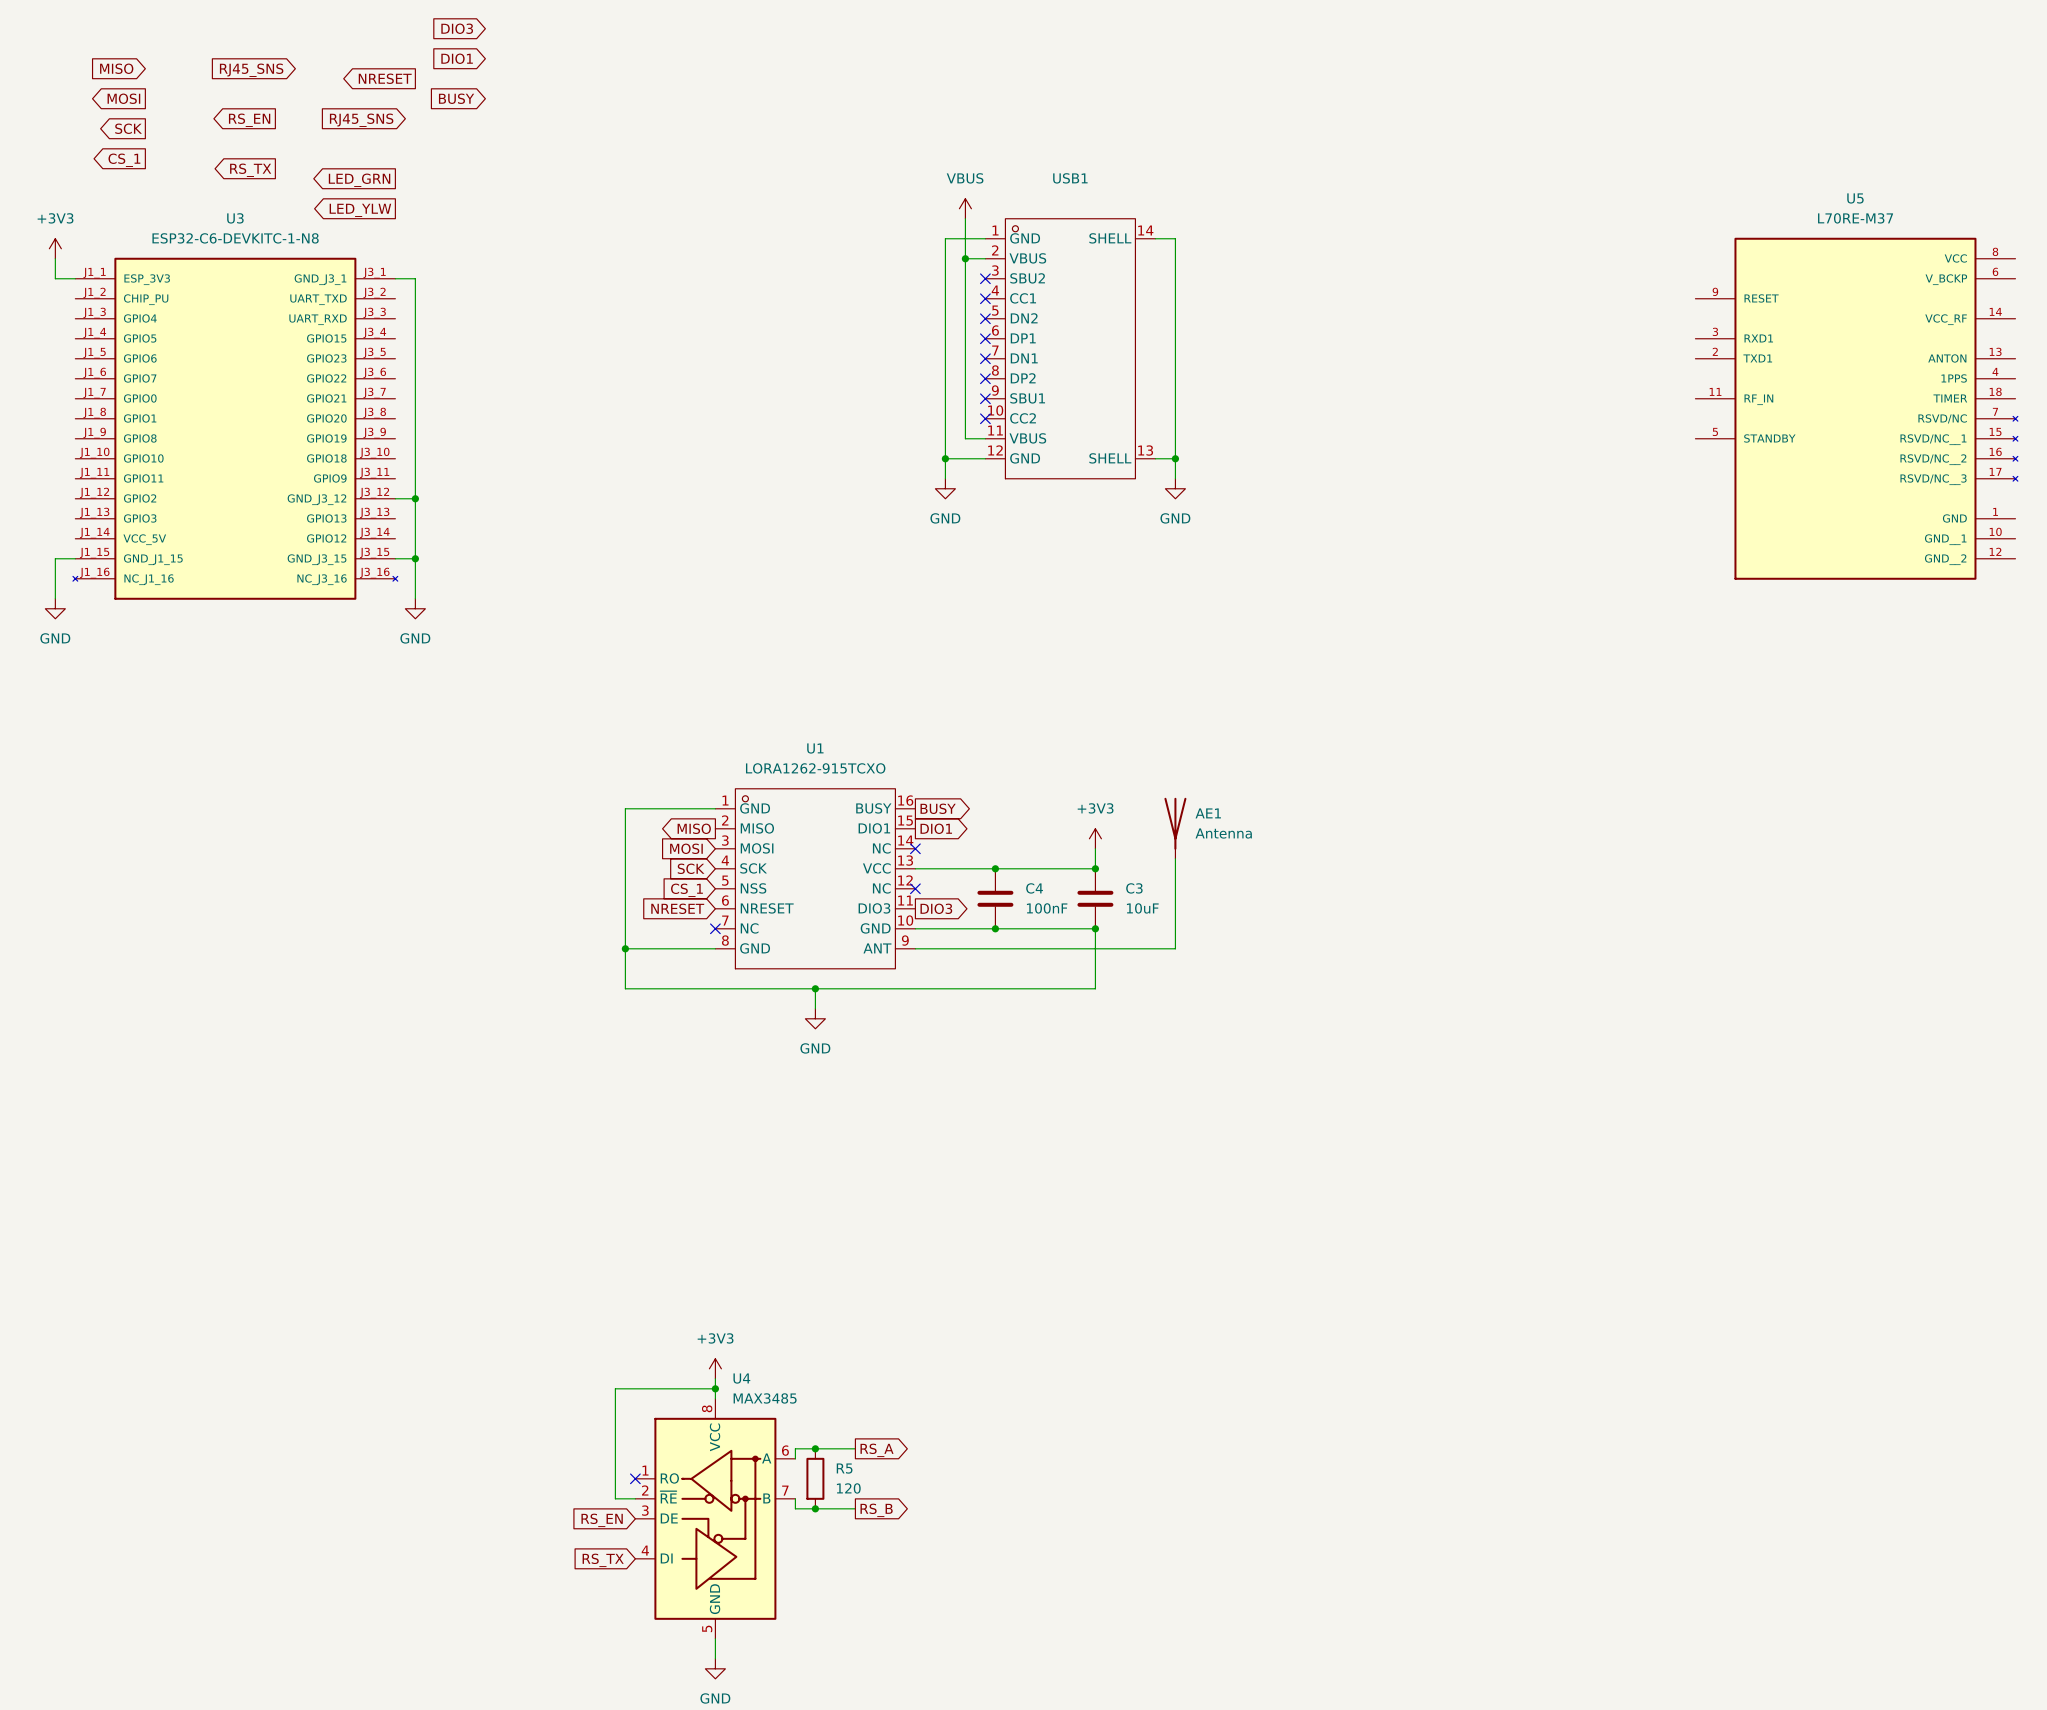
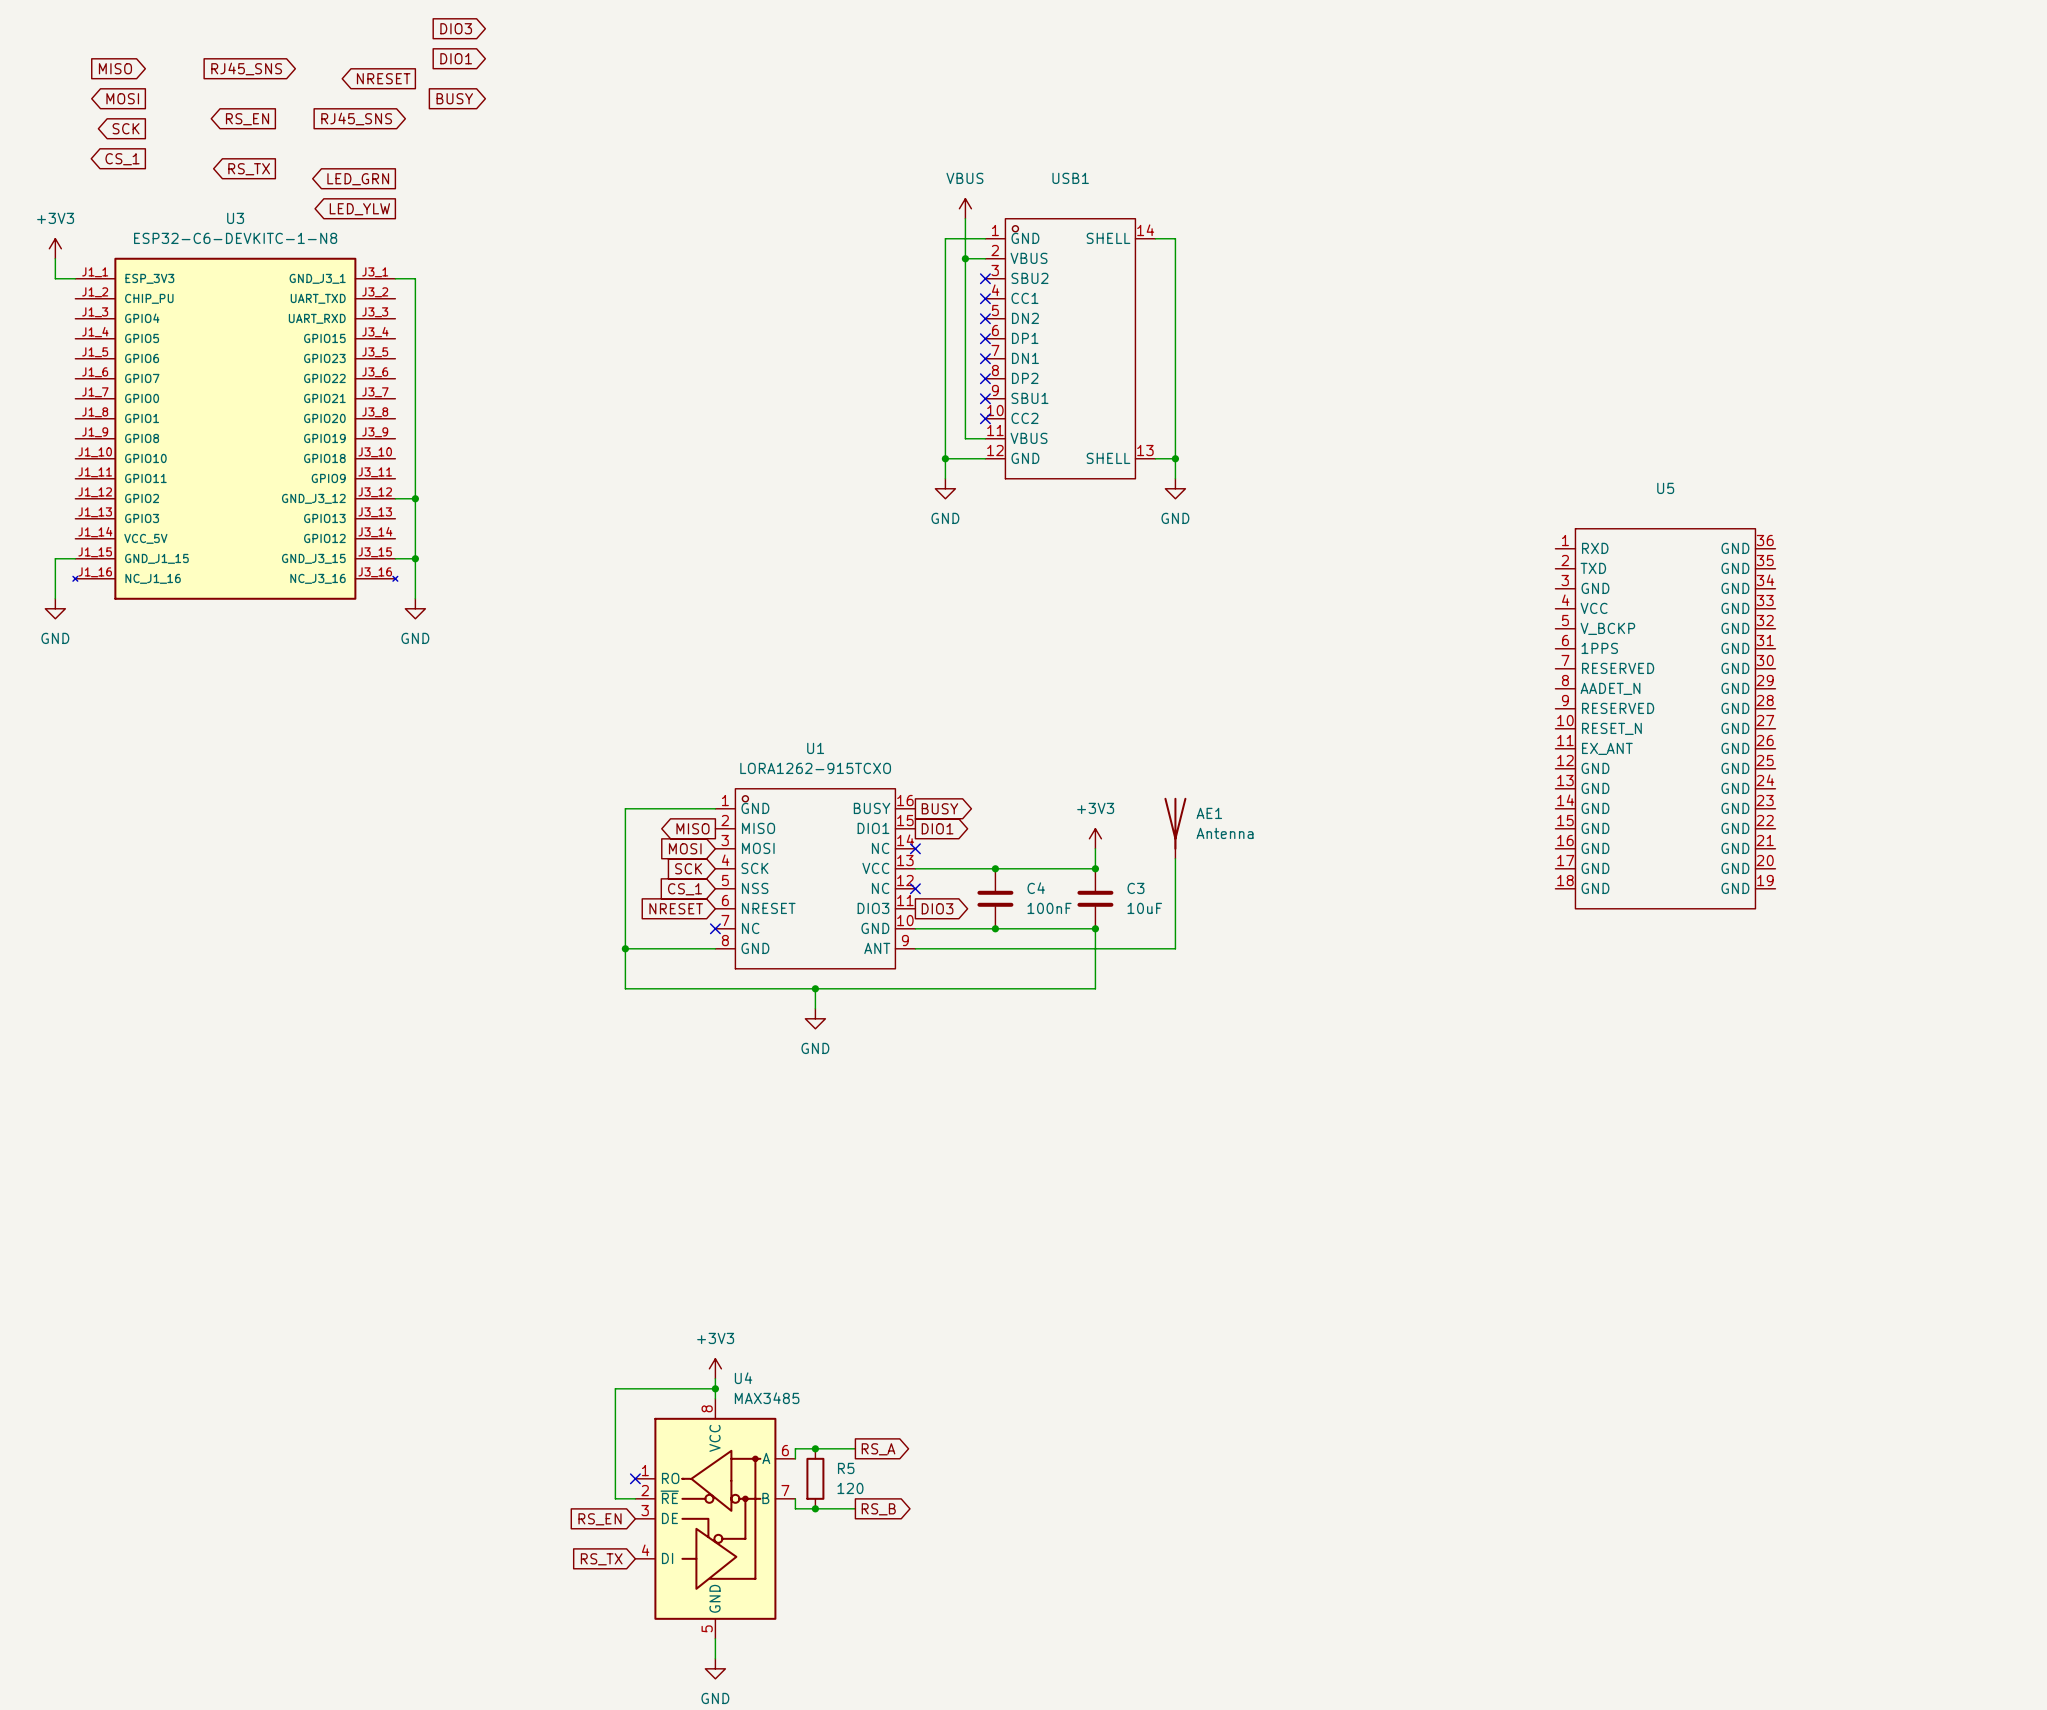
U5 name position: U5 (1855, 198) -> U5 (1665, 488)
U5 value: L70RE-M37 (1855, 218) -> none
U5 symbol: [1695, 237, 2018, 580] -> [1555, 528, 1776, 909]

